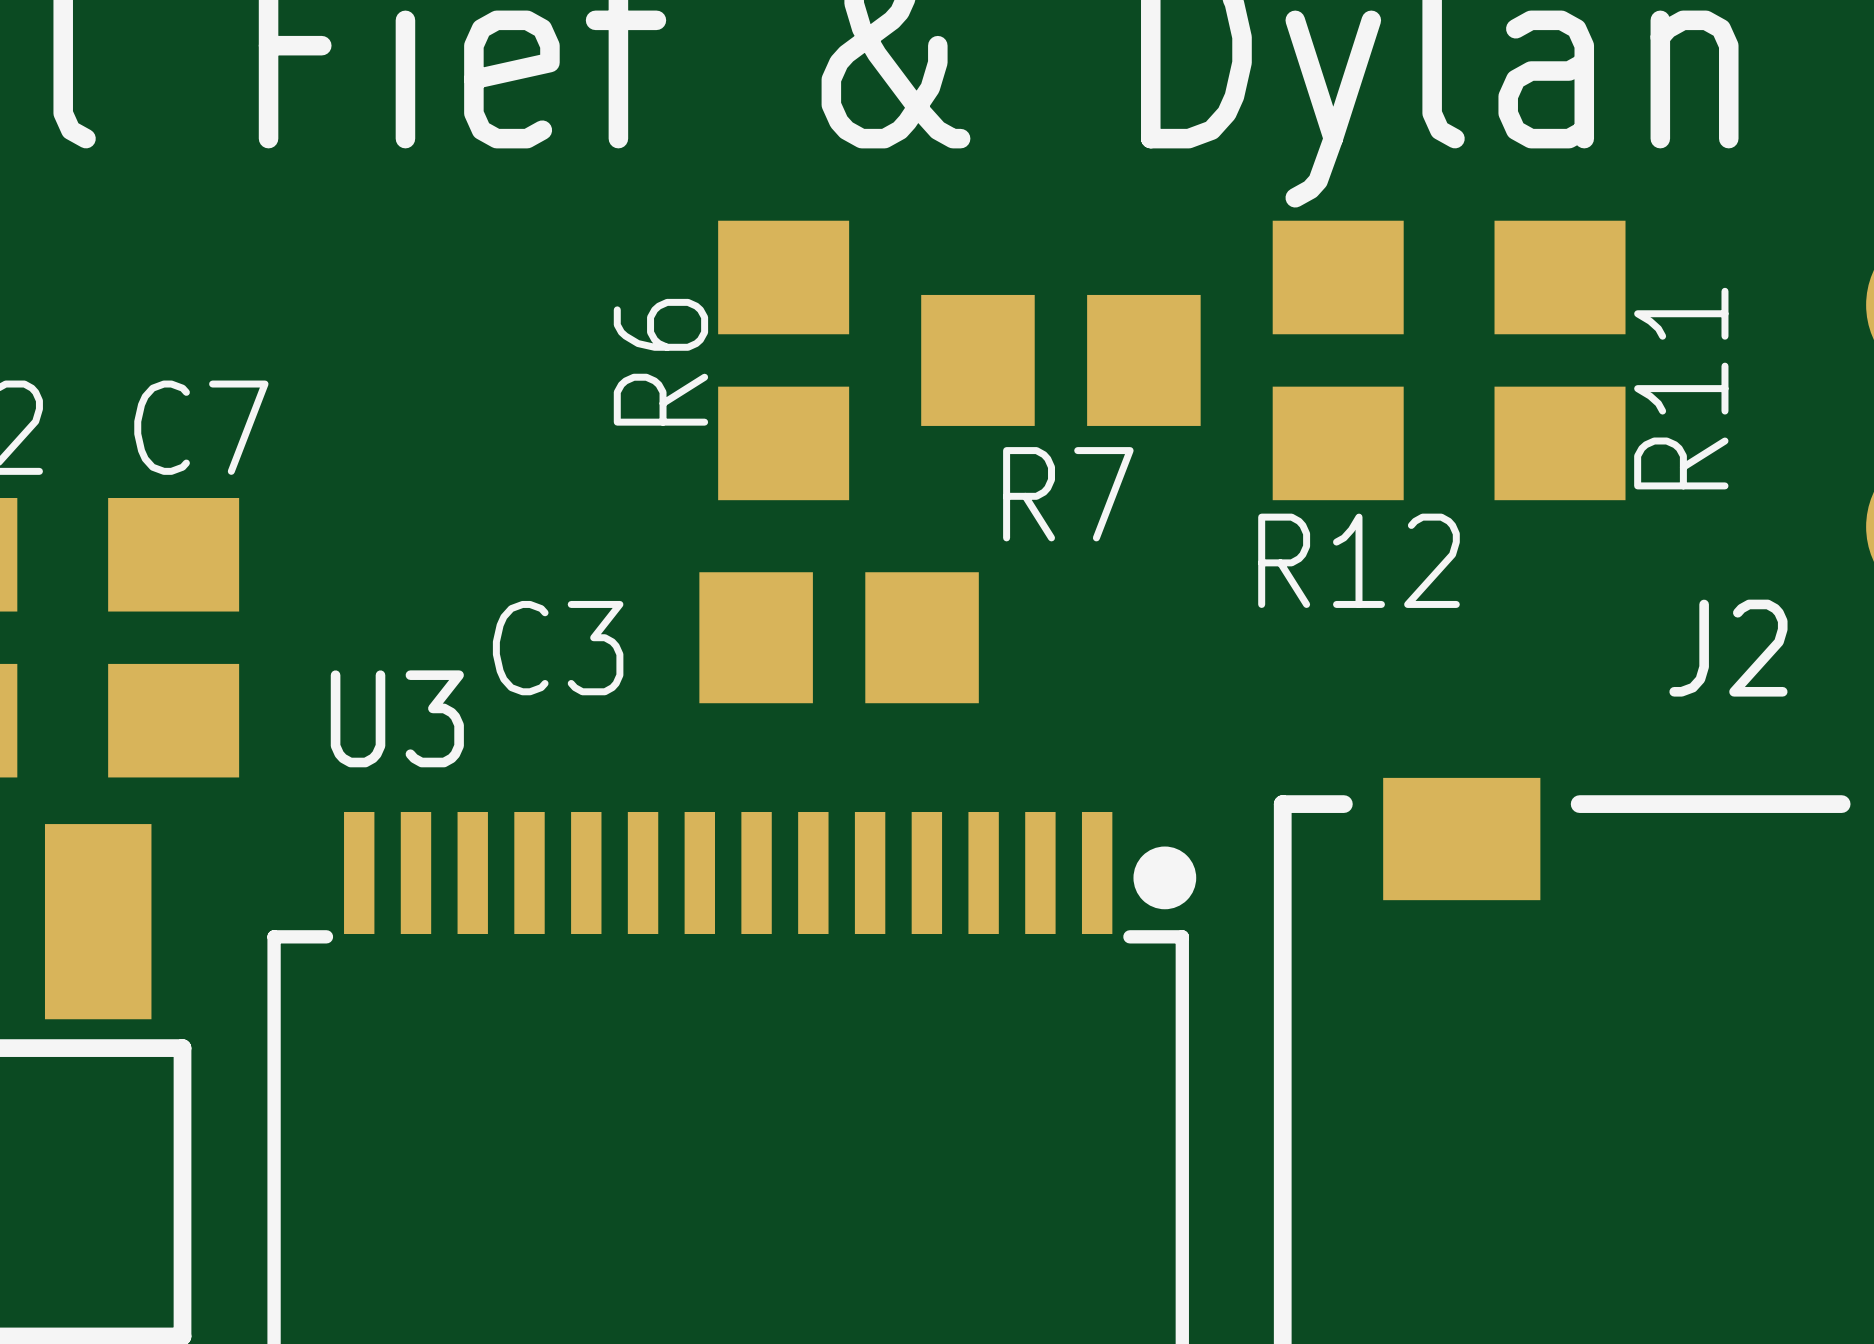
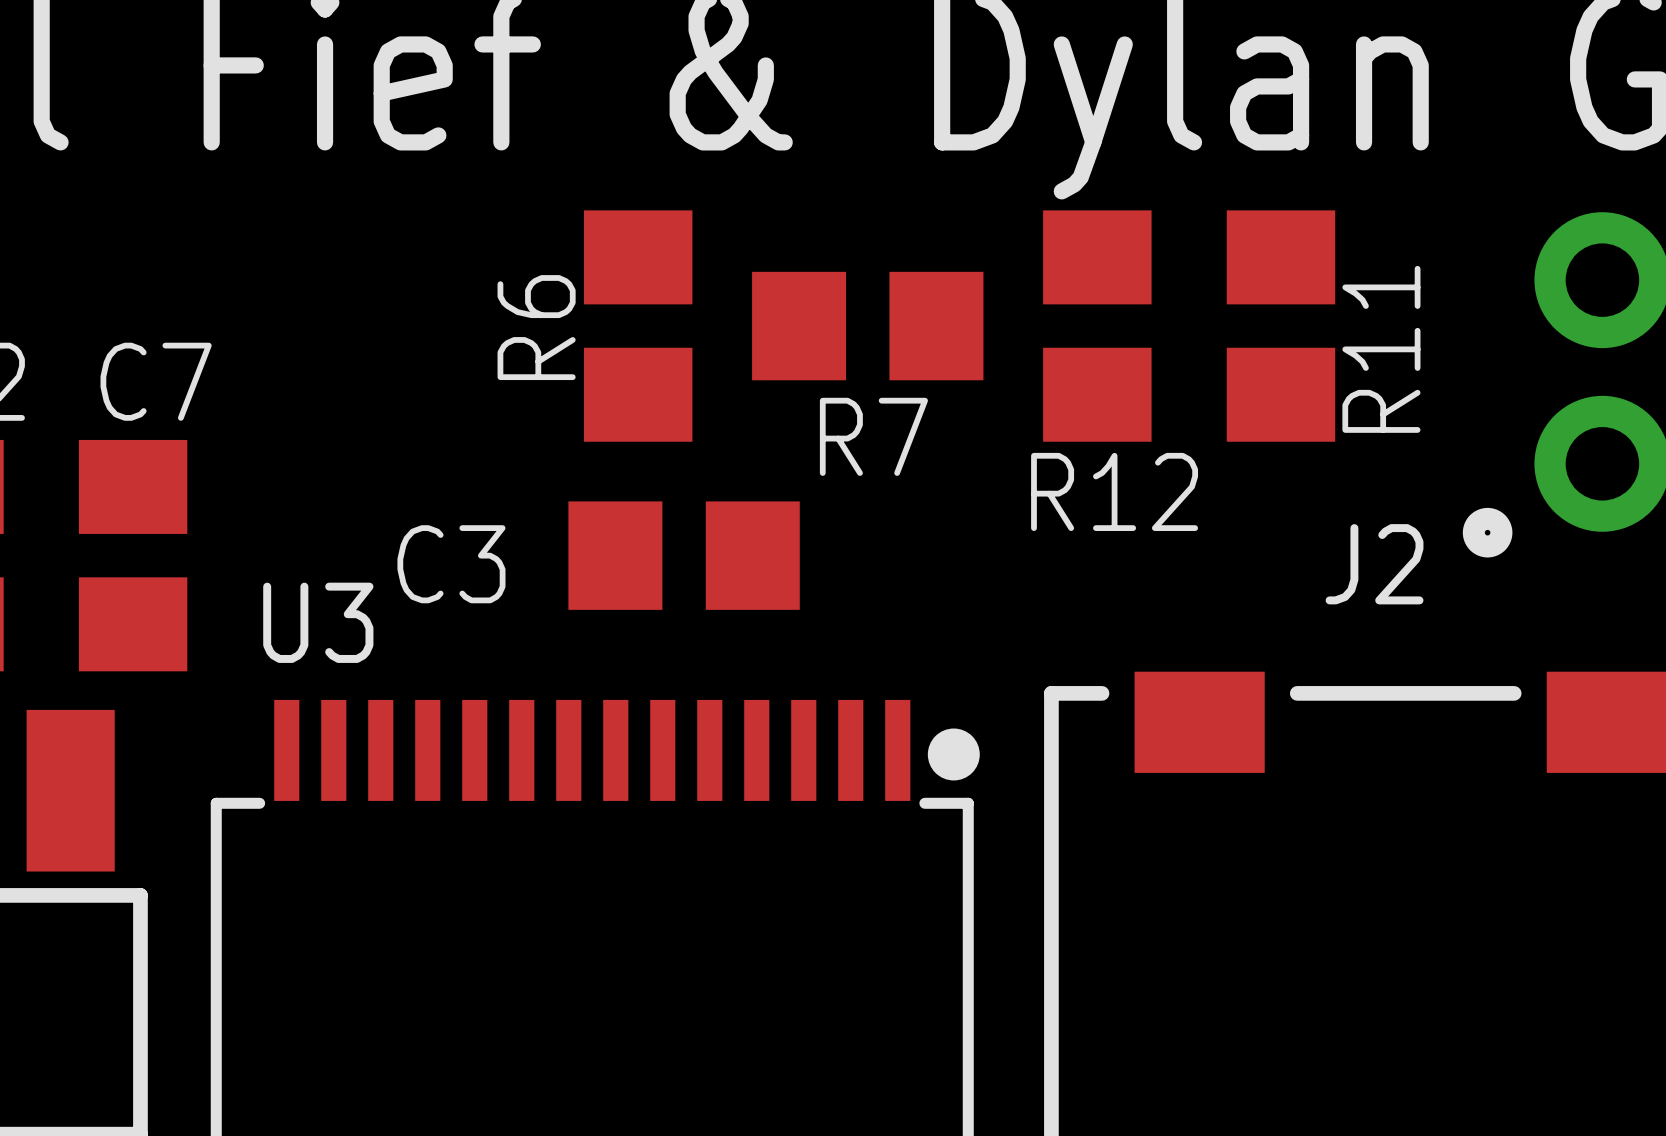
drawing: none -> [1462, 507, 1513, 558]
J2 name position: J2 (1728, 648) -> J2 (1374, 564)

